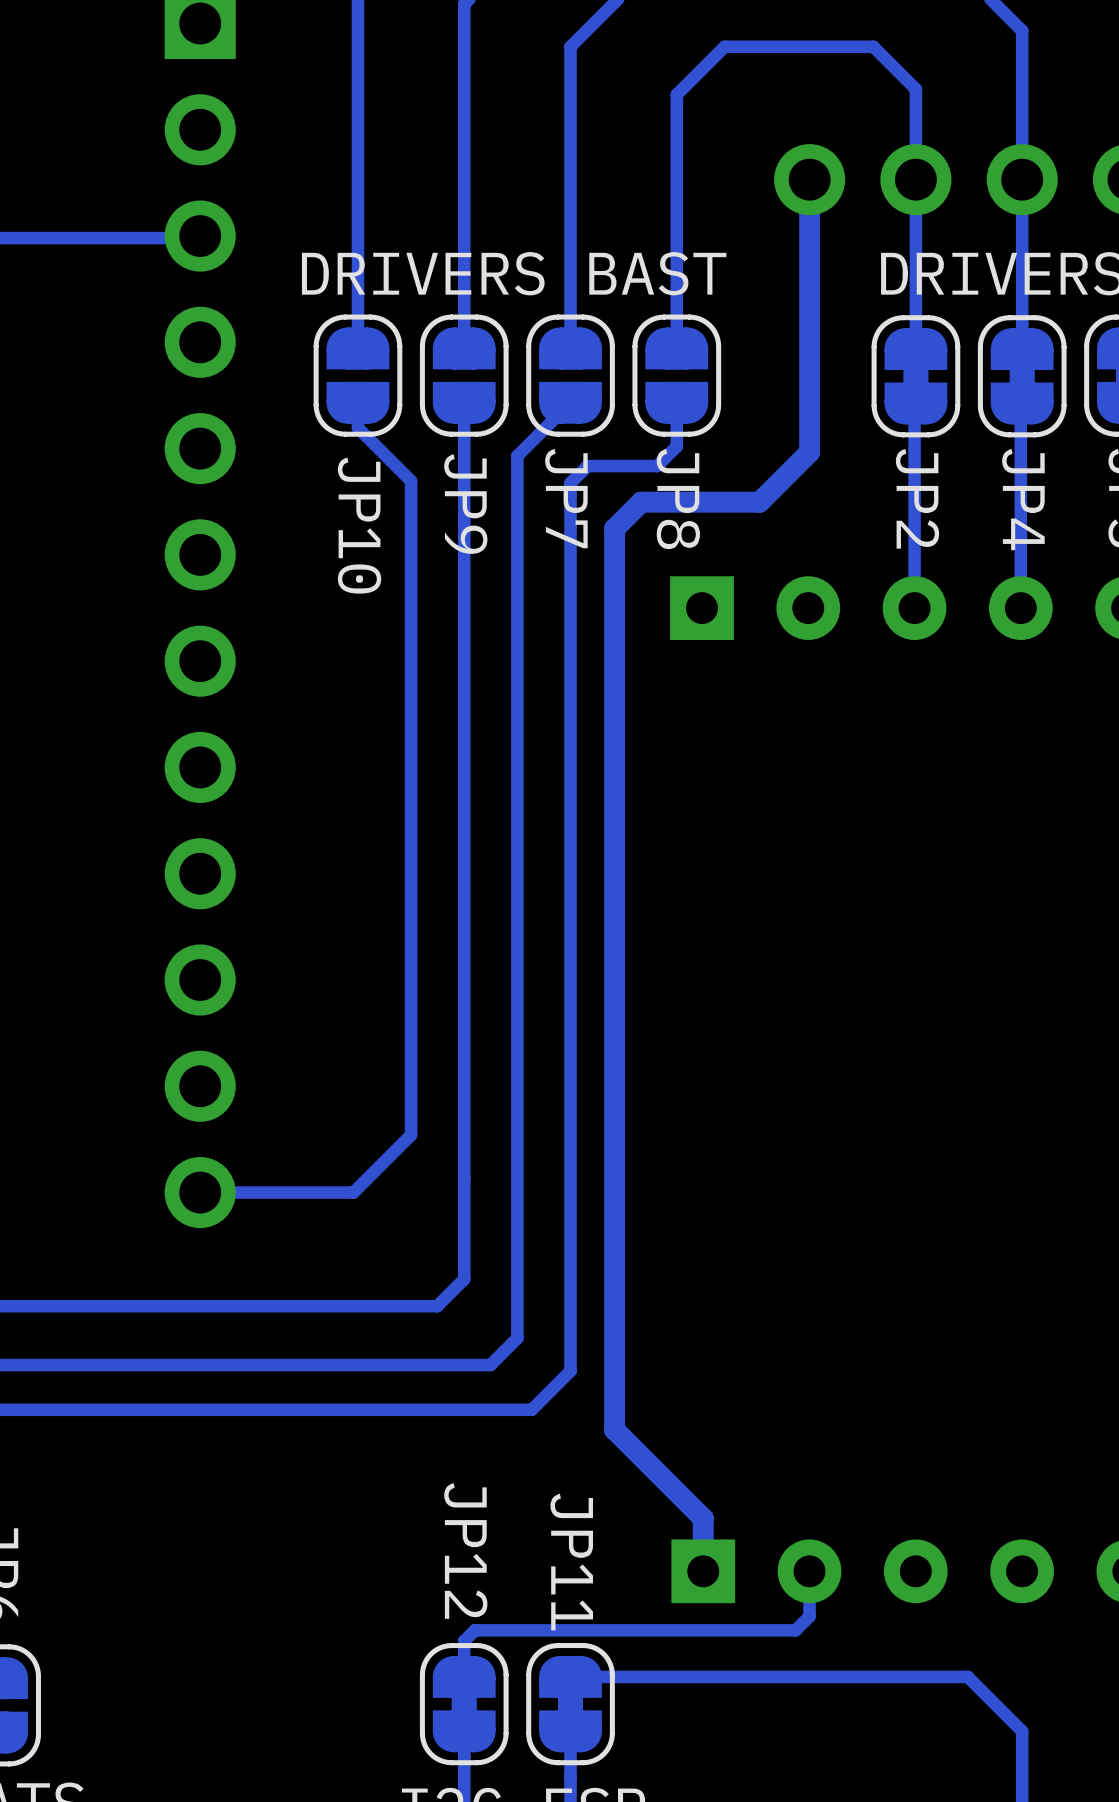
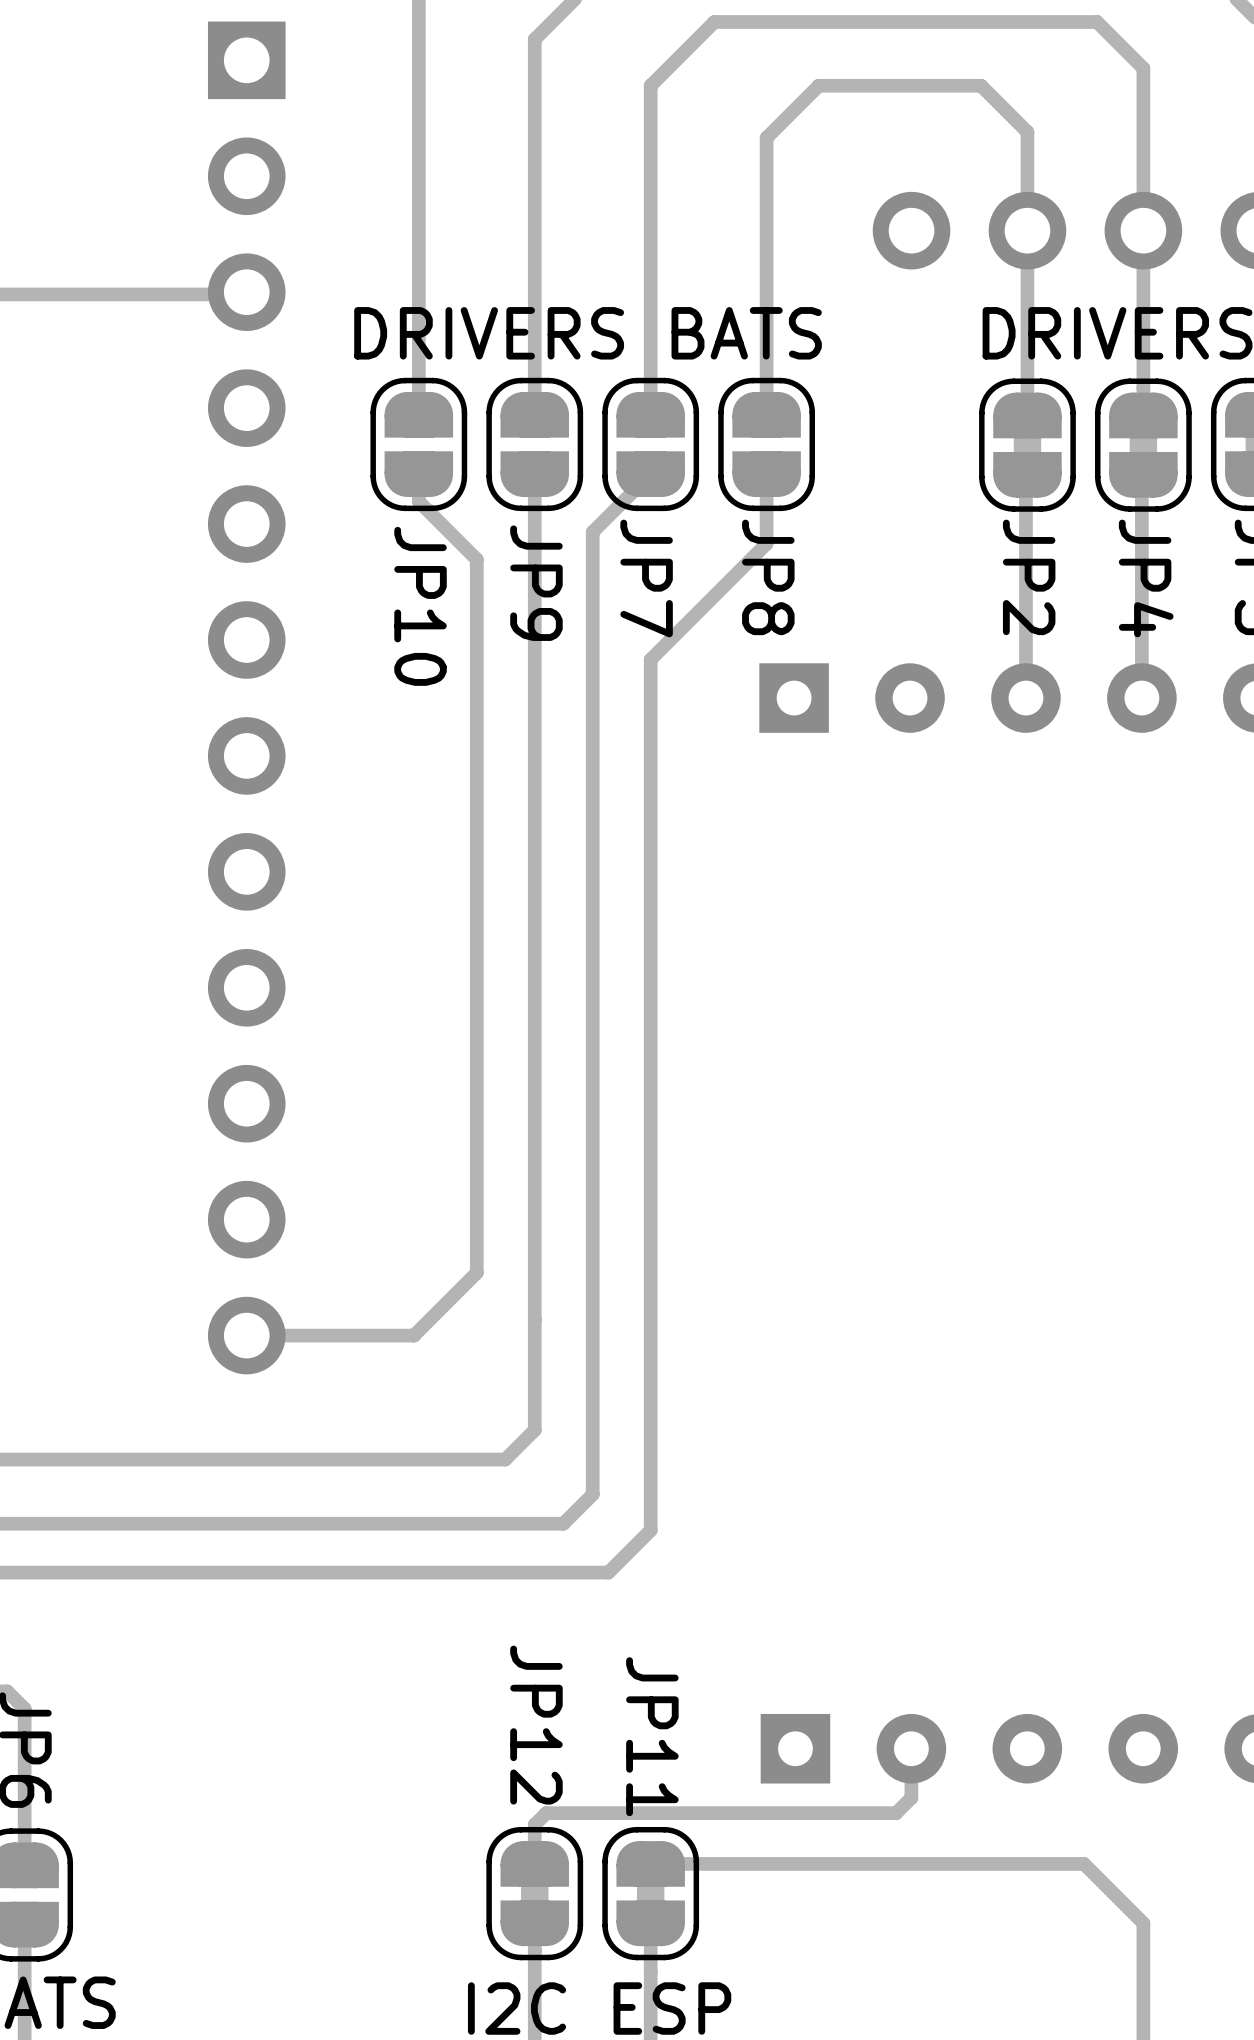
track: (809, 179) (809, 452) (759, 502) (641, 502) -> none
text: DRIVERS BAST (514, 273) -> DRIVERS BATS (588, 333)
track: (676, 446) (657, 466) (587, 466) (570, 483) (570, 572) -> (766, 521) (766, 543) (727, 582)
track width: thick (641, 502) (614, 528) -> thin (727, 582) (698, 611)
track: (614, 528) (614, 1429) (703, 1518) (703, 1571) -> (698, 611) (650, 659)

